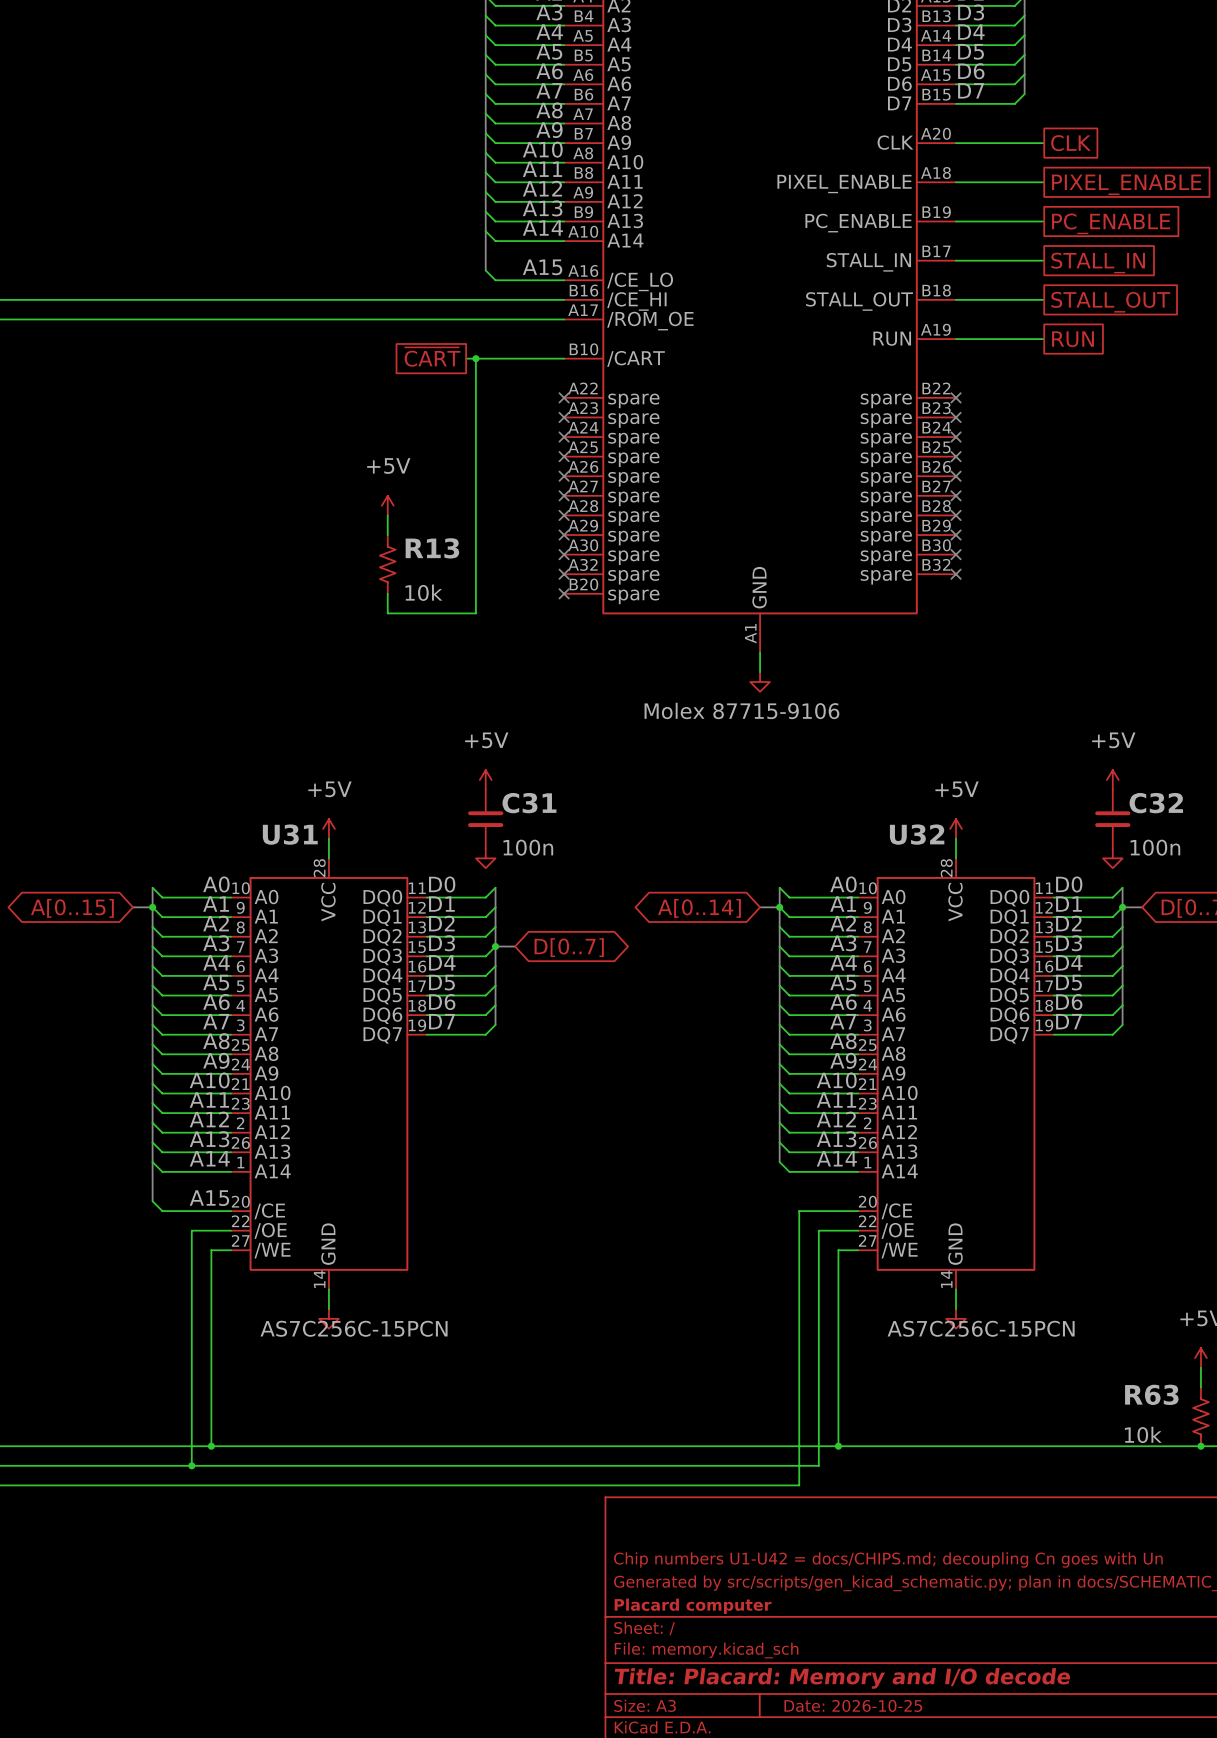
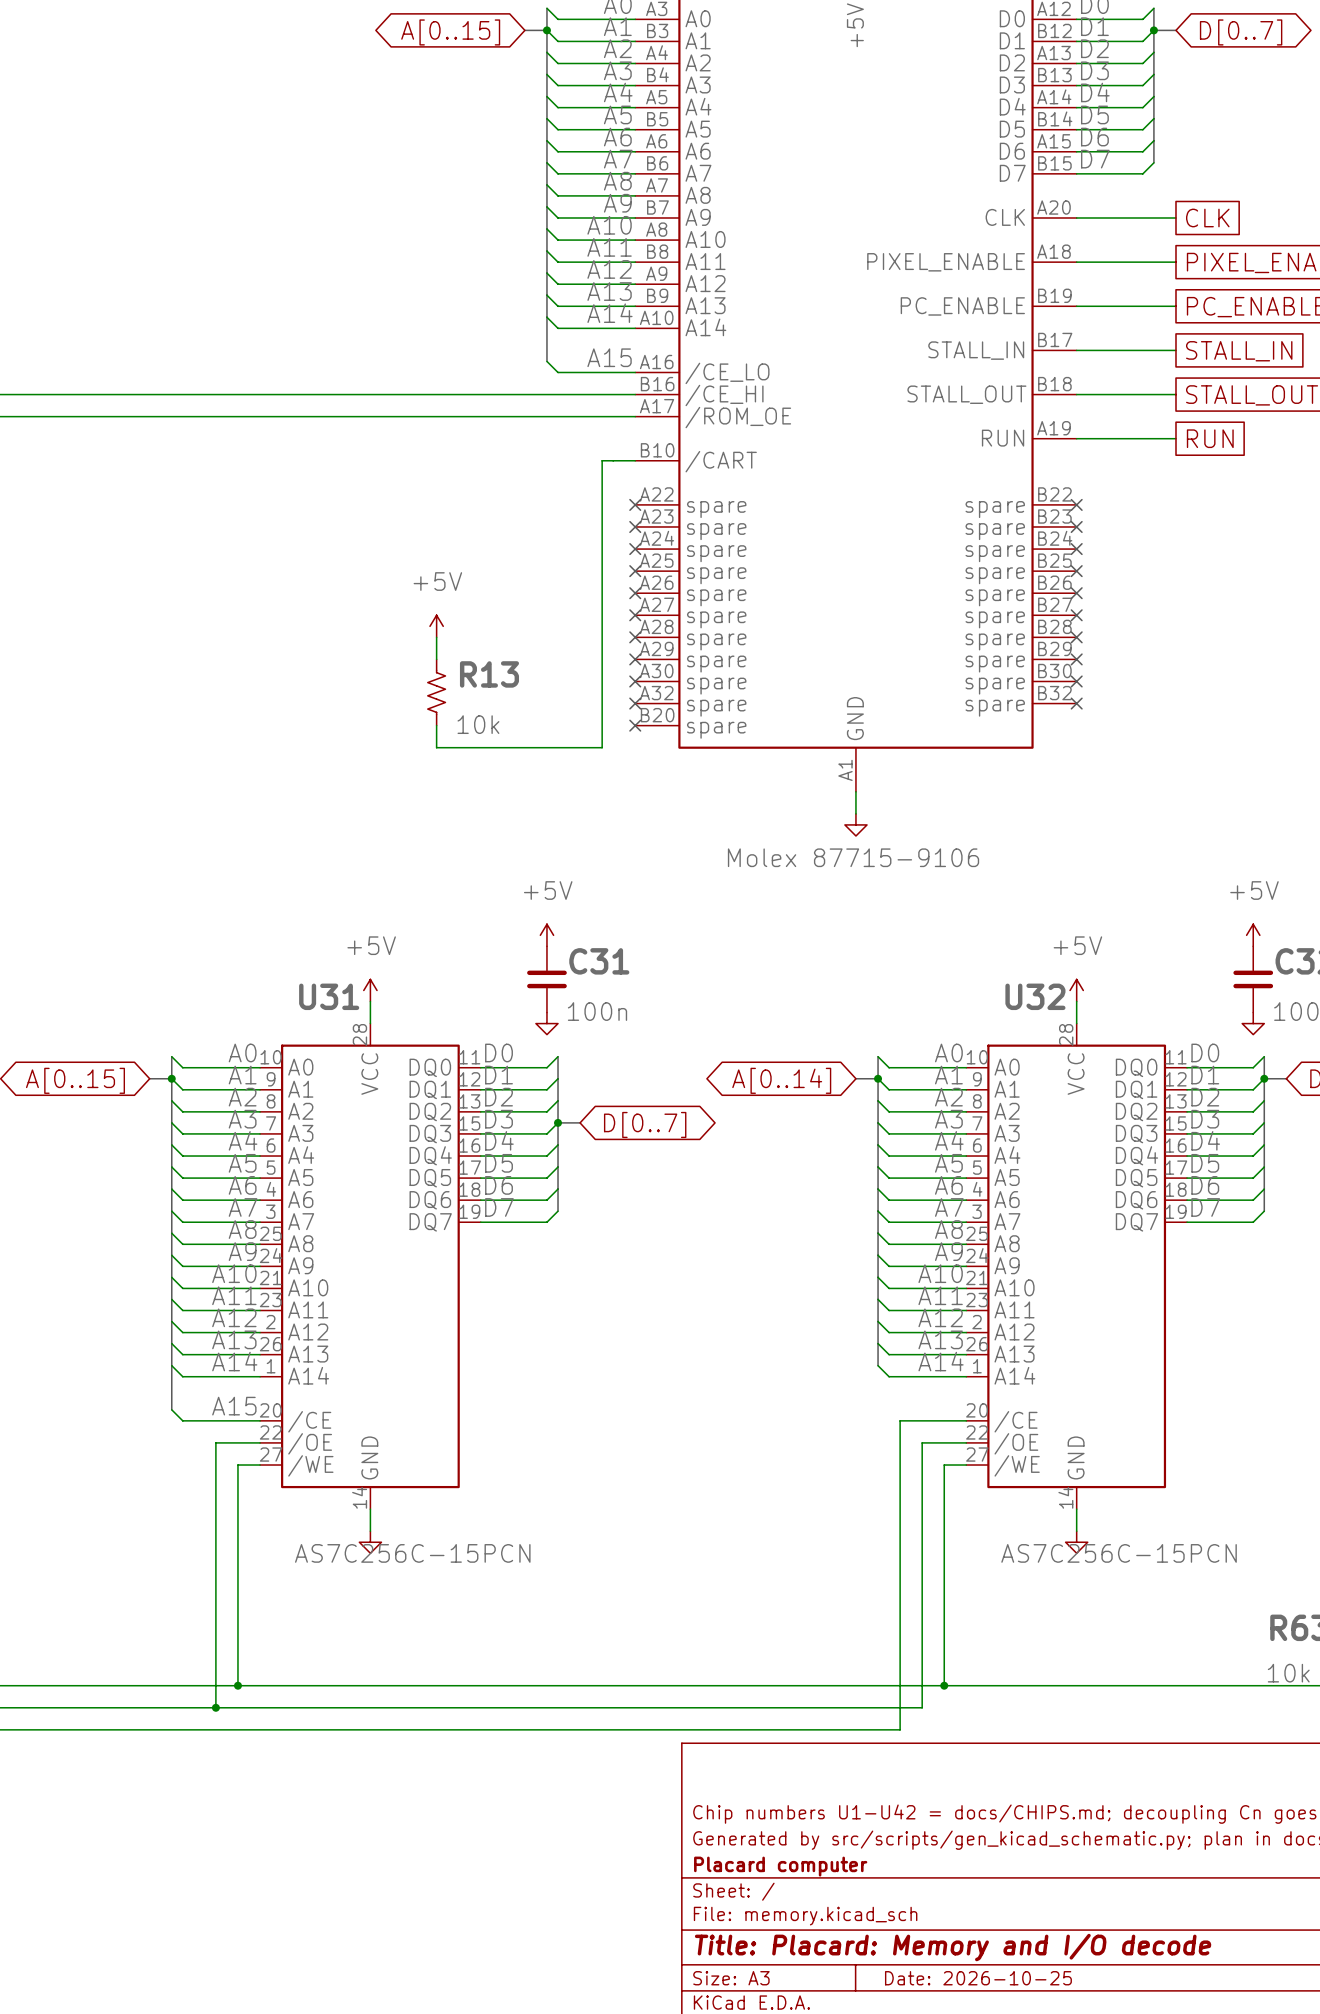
global label: ~{CART} (432, 357) -> none
wire: (466, 358) (534, 358) -> none
wire: (475, 358) (475, 613) -> (602, 460) (602, 747) (535, 747)
junction: (475, 358) -> none

